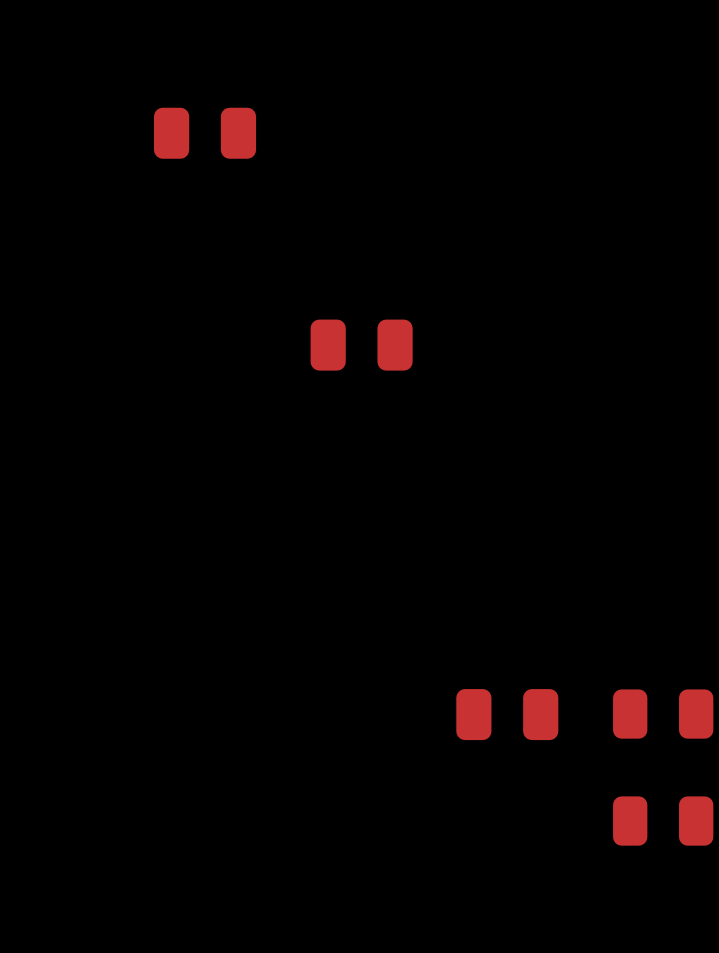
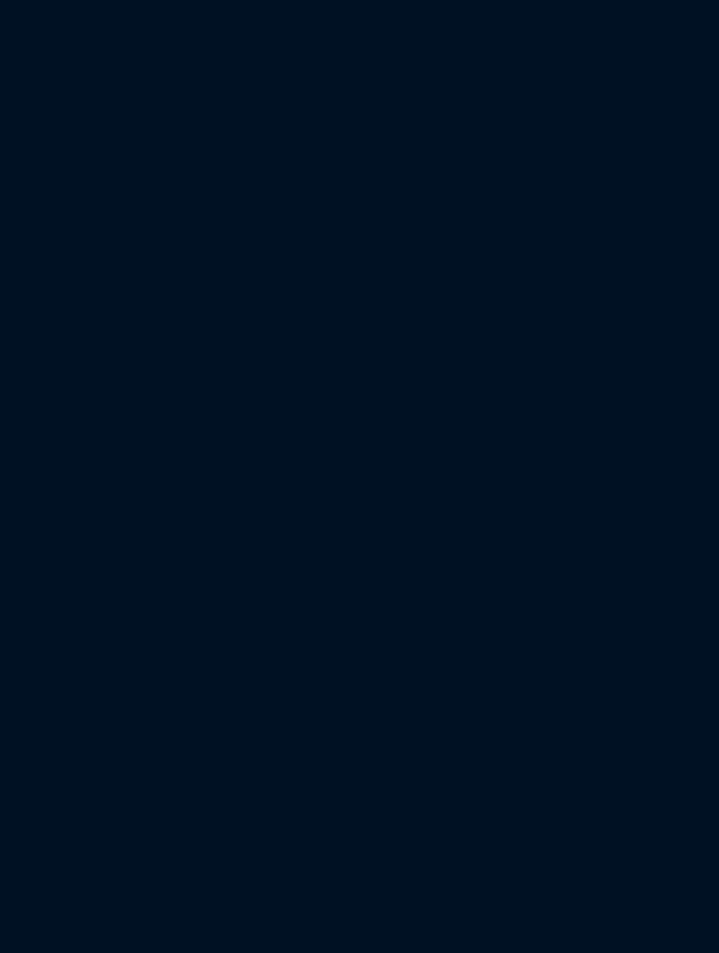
part: (205, 133) -> none
part: (361, 345) -> none
part: (507, 714) -> none
part: (663, 714) -> none
part: (663, 821) -> none

